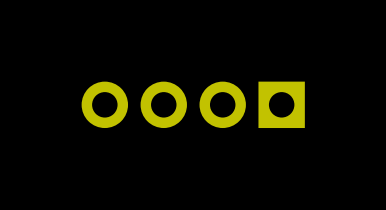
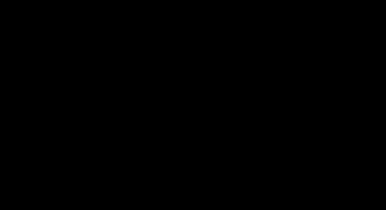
part: (193, 104) -> none

